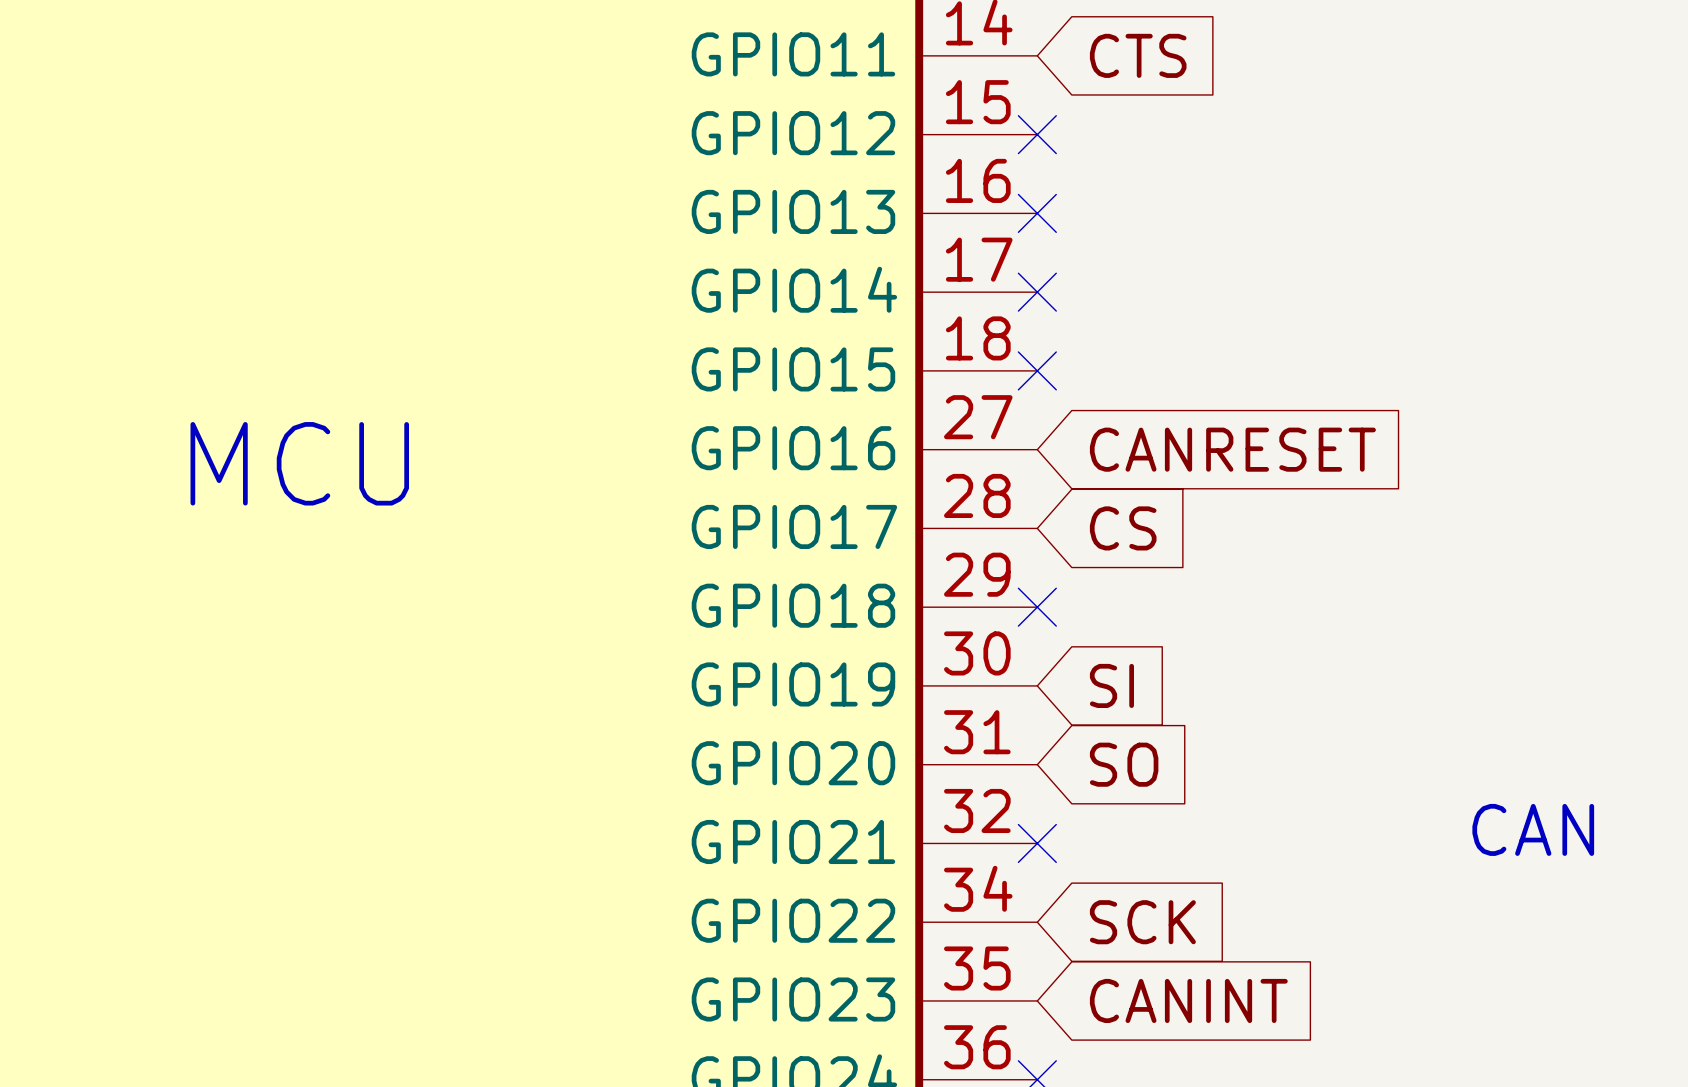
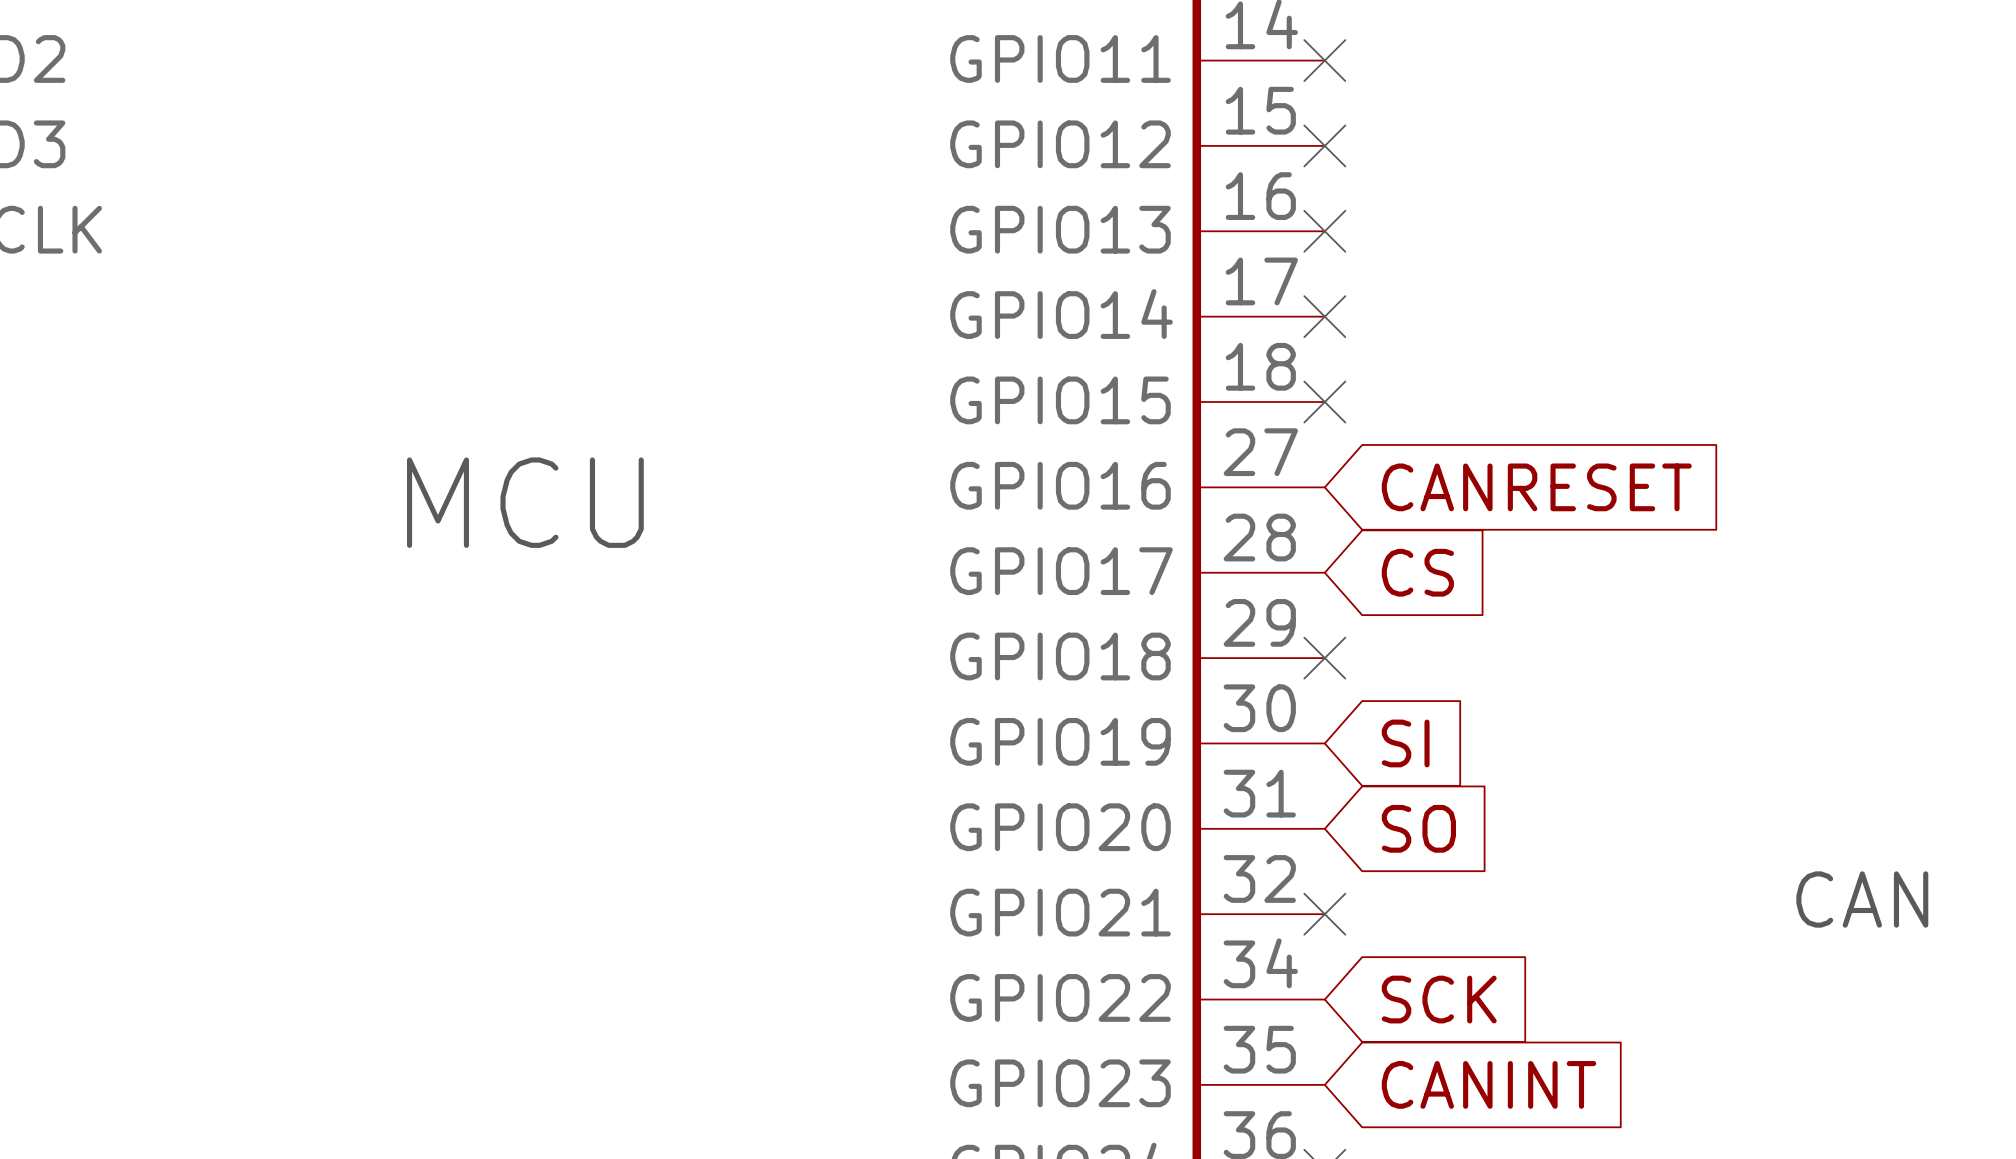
no-connect mark: none -> (1324, 60)
global label: CTS (1138, 55) -> none

